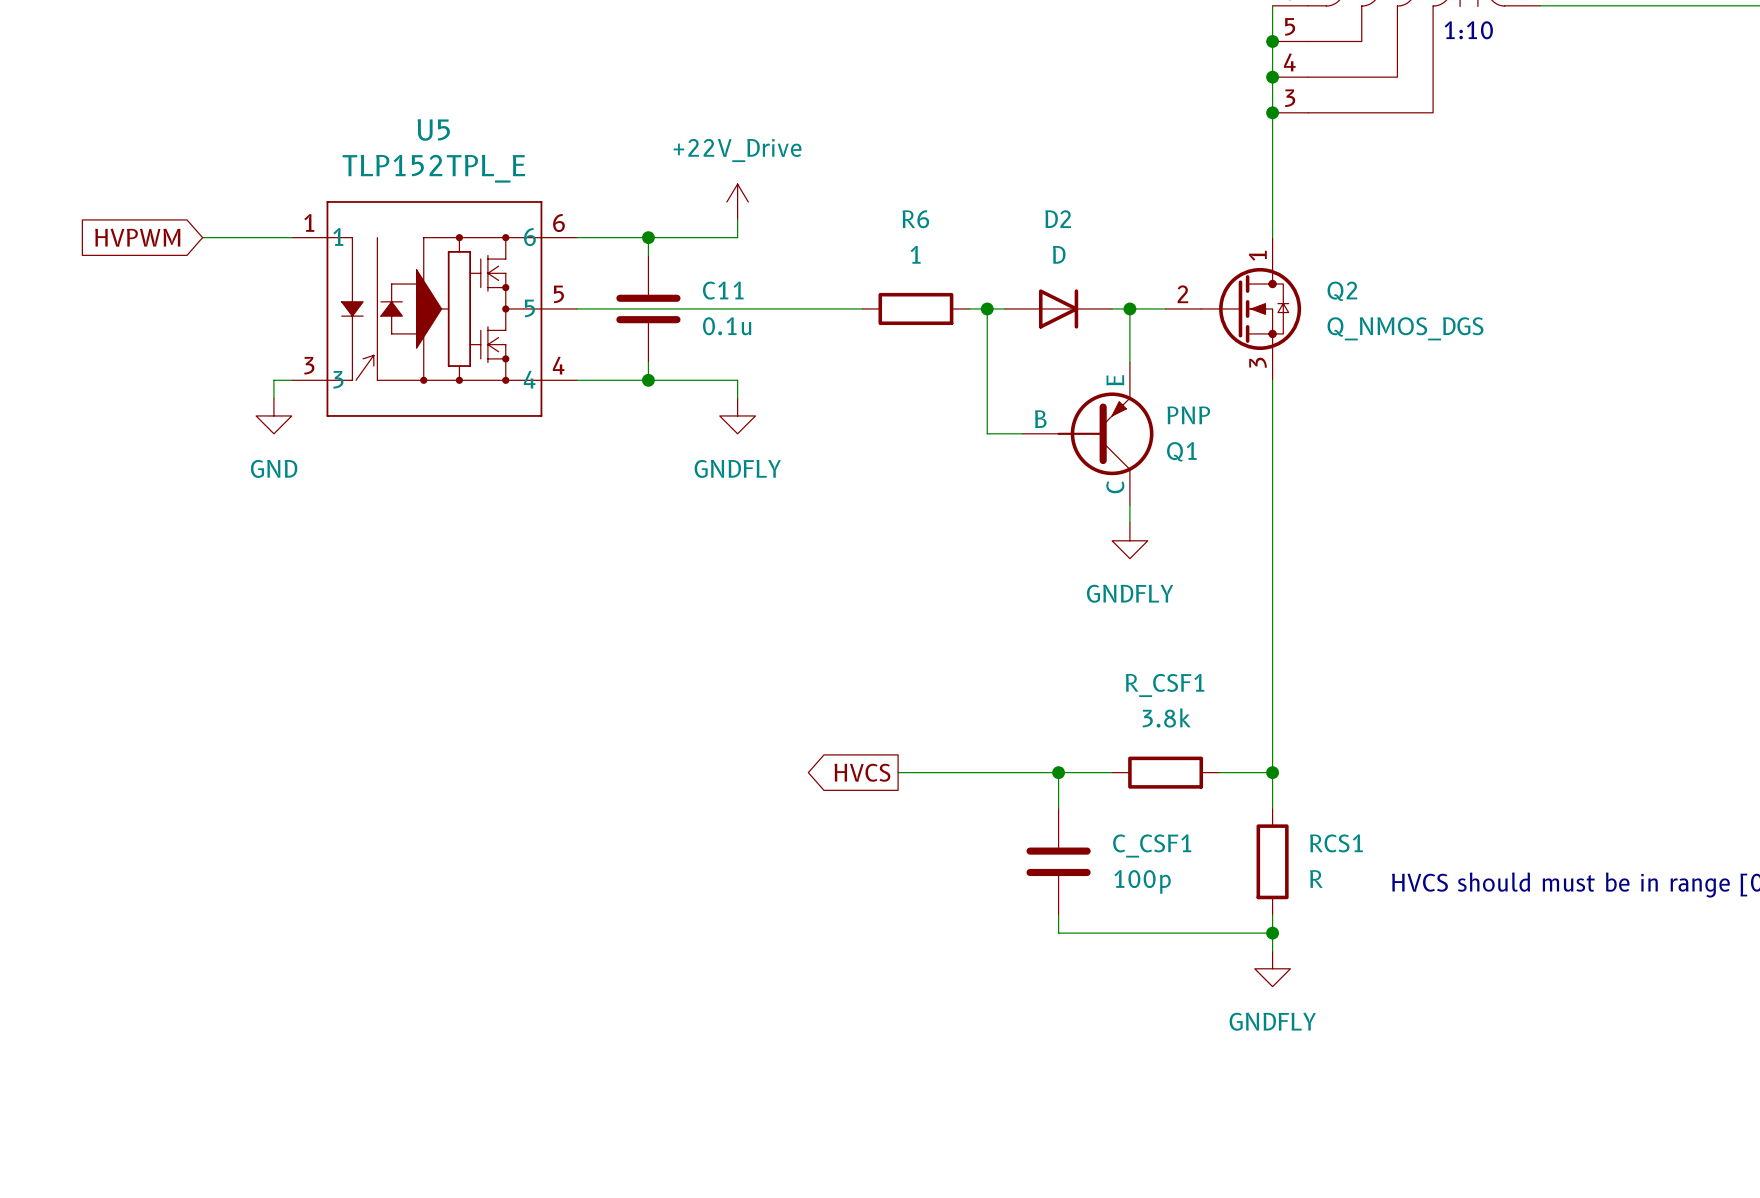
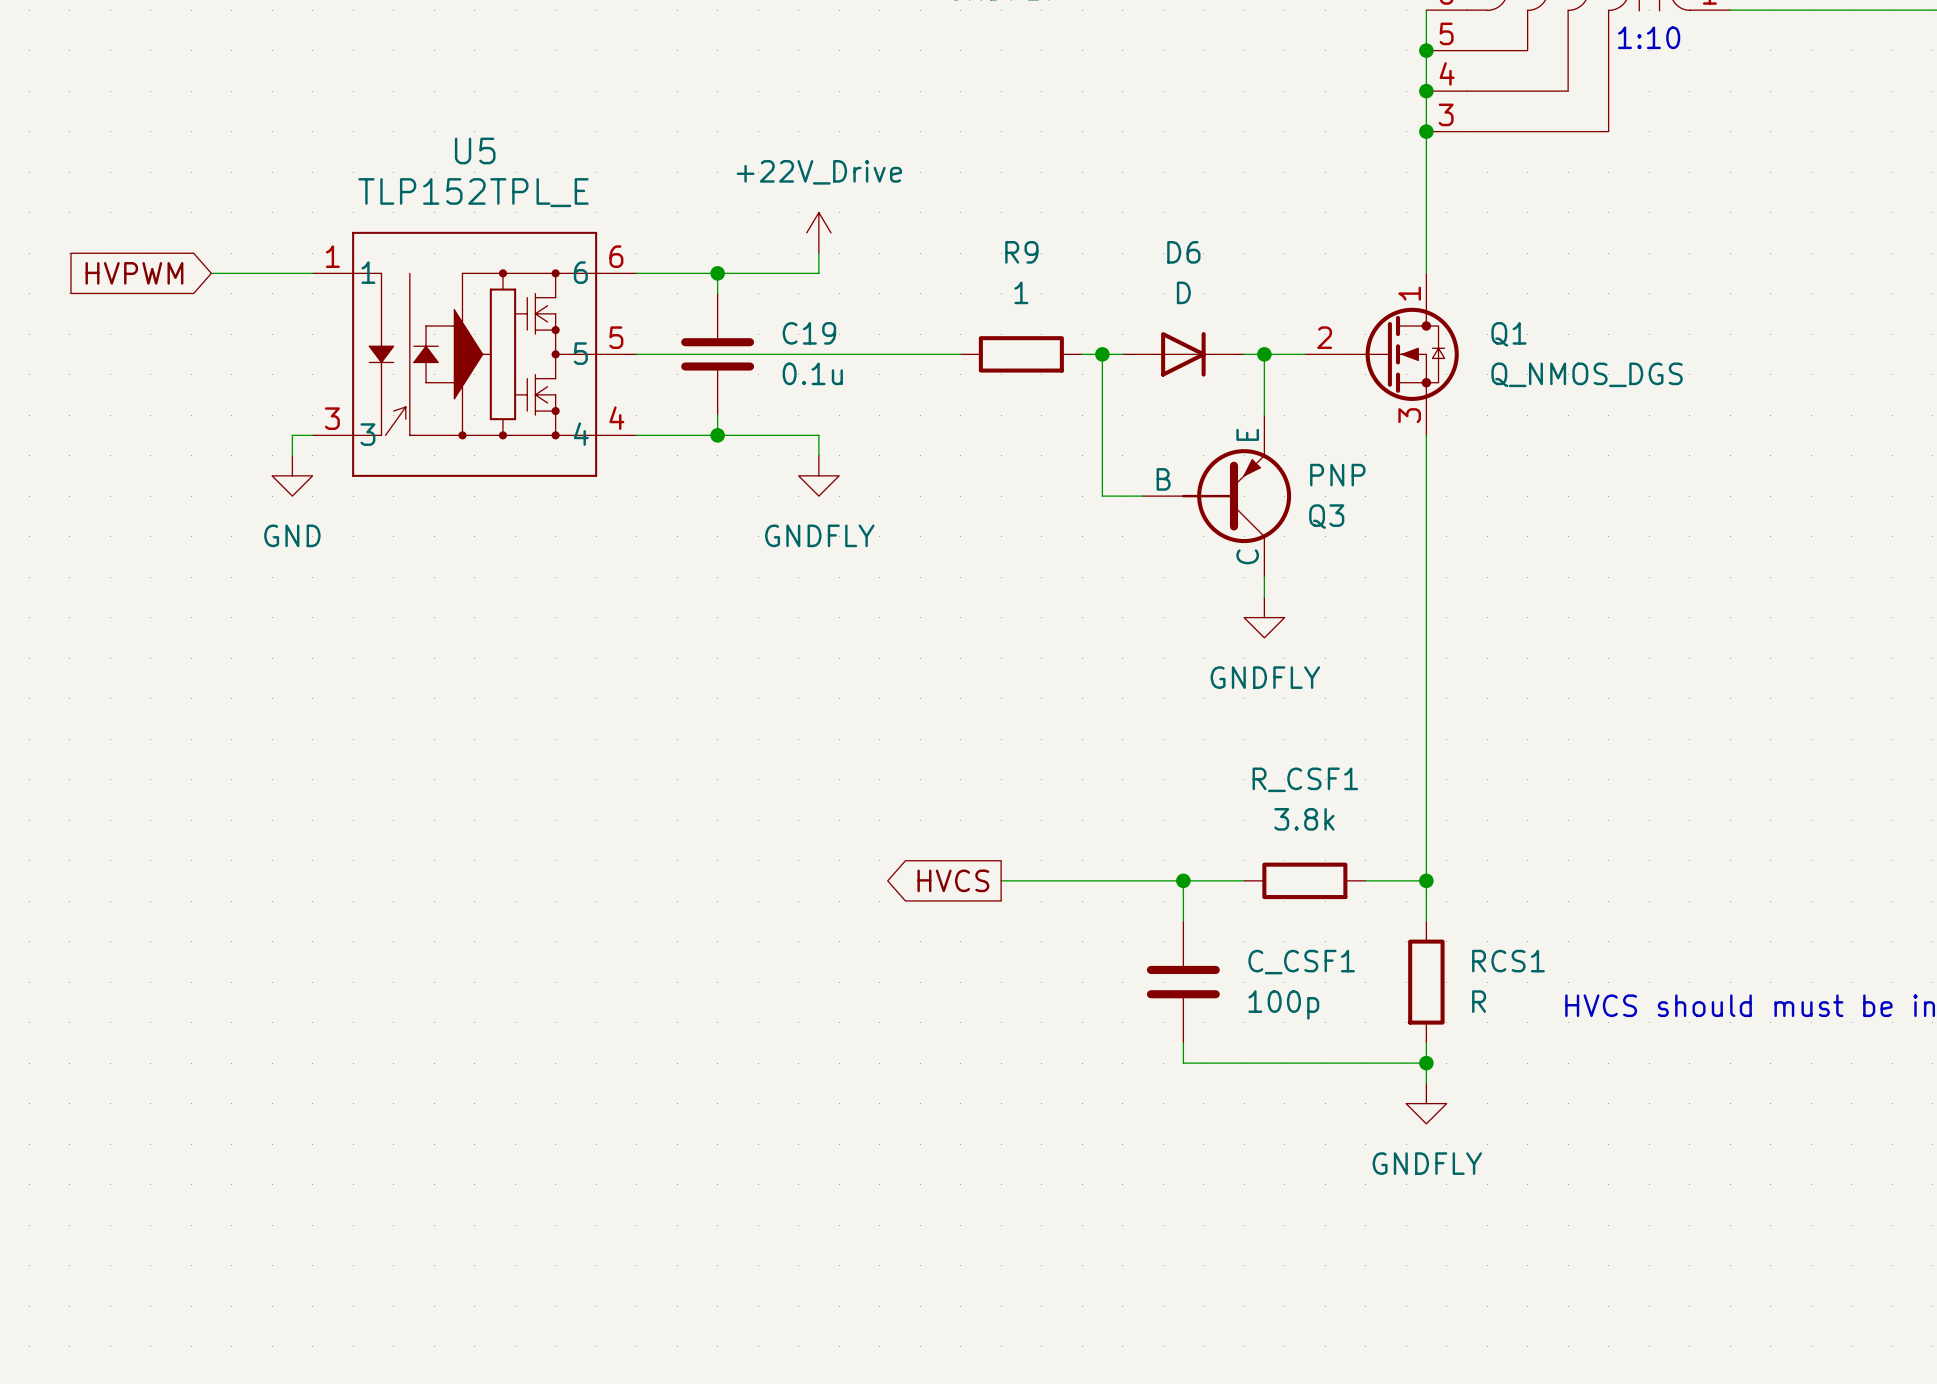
R6 name: R6 (915, 219) -> R9 (1021, 252)
D2 name: D2 (1058, 219) -> D6 (1183, 252)
C11 name: C11 (723, 290) -> C19 (809, 333)
Q2 name: Q2 (1342, 291) -> Q1 (1508, 334)
Q1 name: Q1 (1181, 451) -> Q3 (1326, 516)

